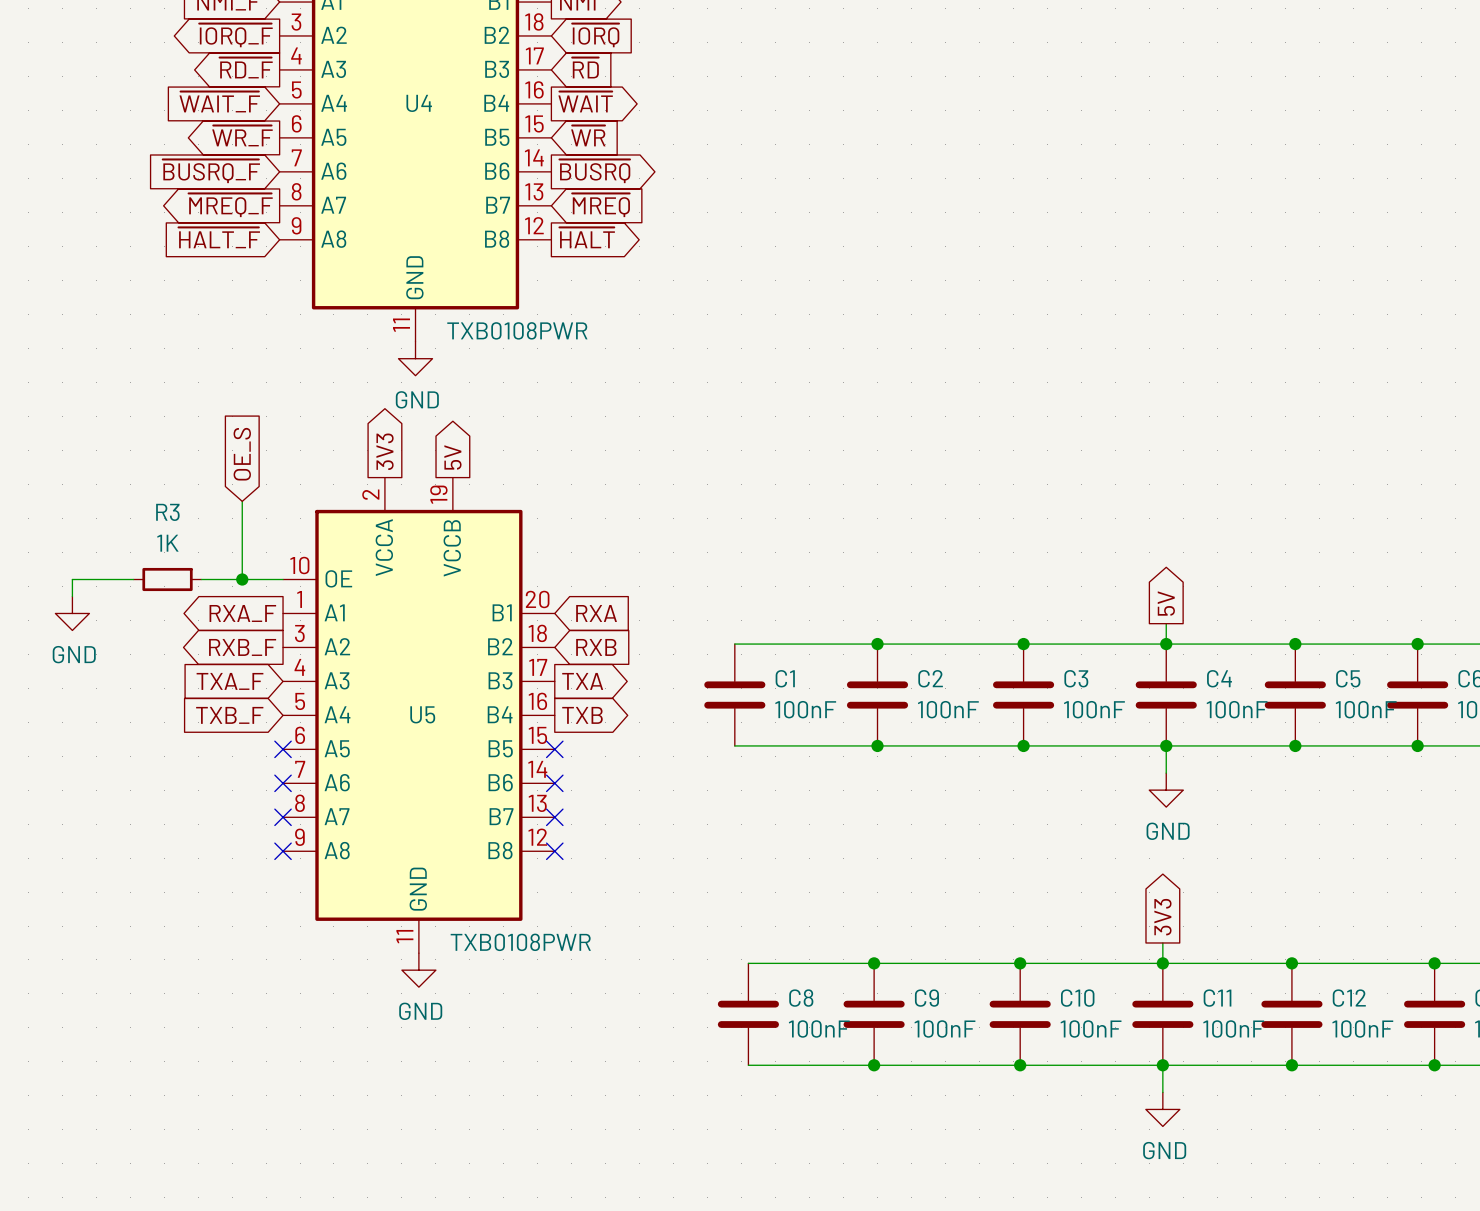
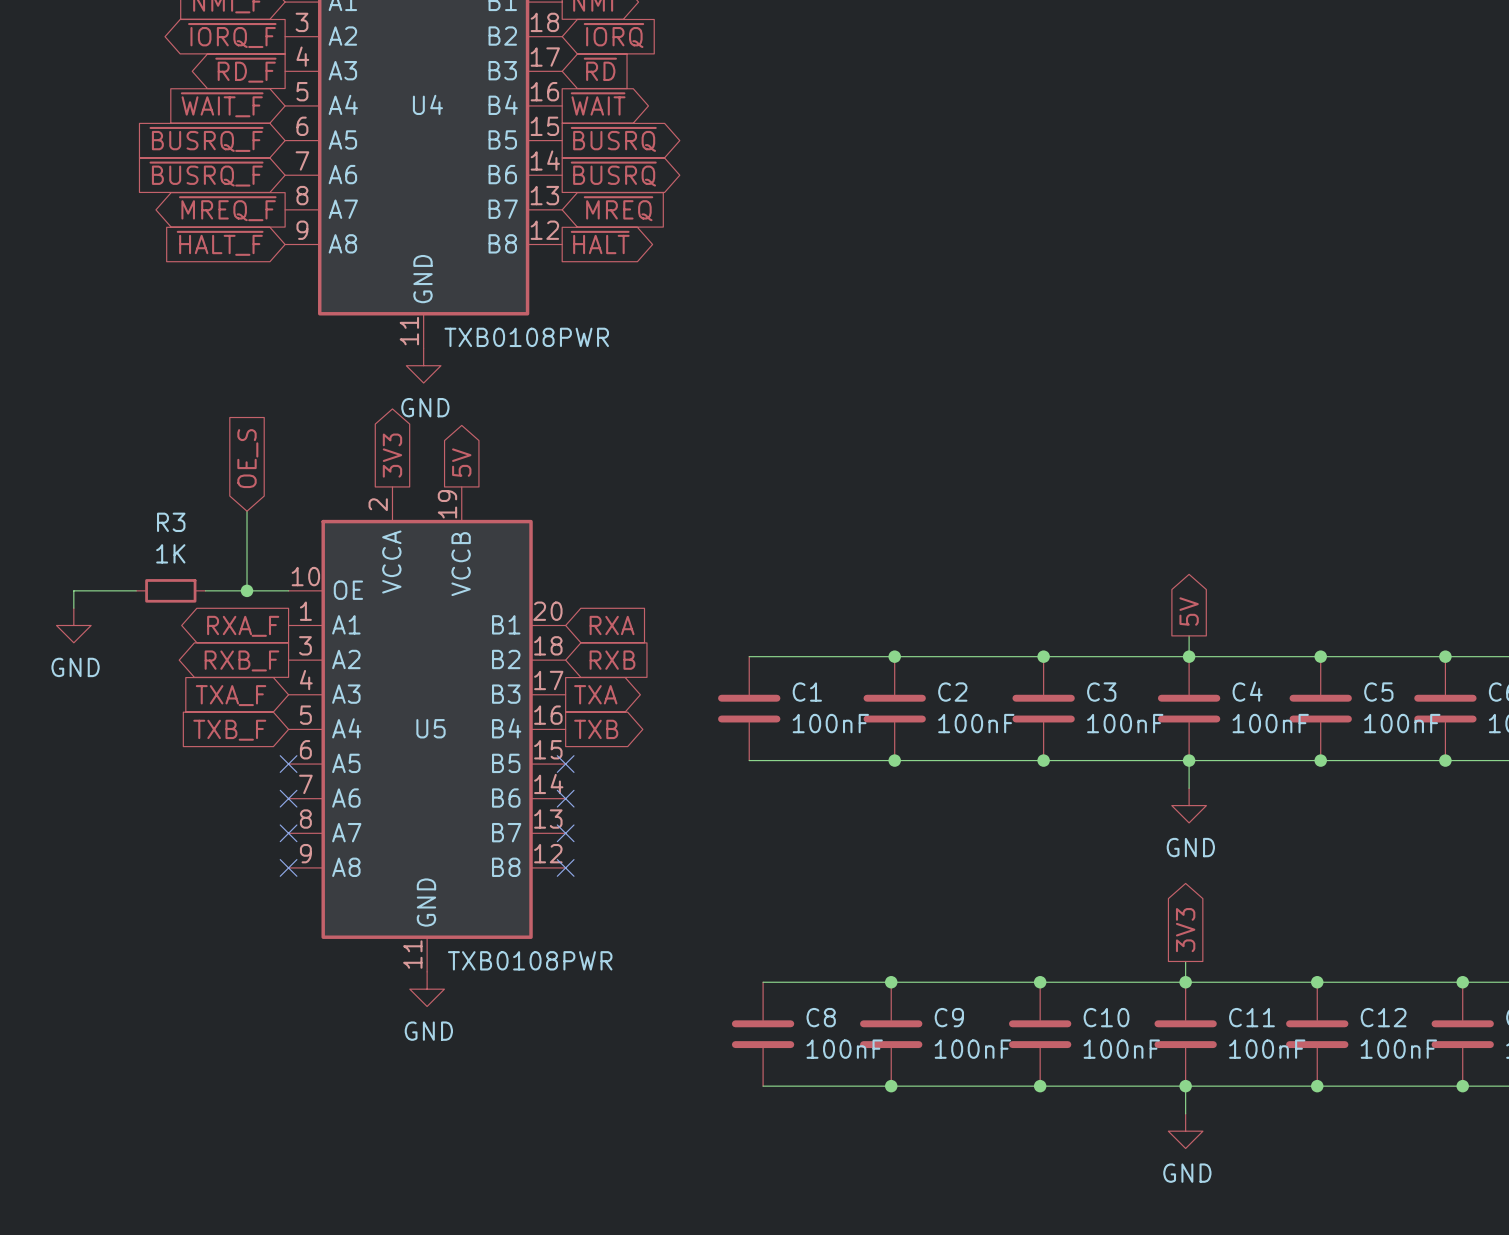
global label shape: output (242, 135) -> input (206, 139)
global label: ~{WR_F} (242, 135) -> ~{BUSRQ_F} (206, 139)
global label shape: input (588, 135) -> output (613, 139)
global label: ~{WR} (588, 135) -> ~{BUSRQ} (613, 139)

